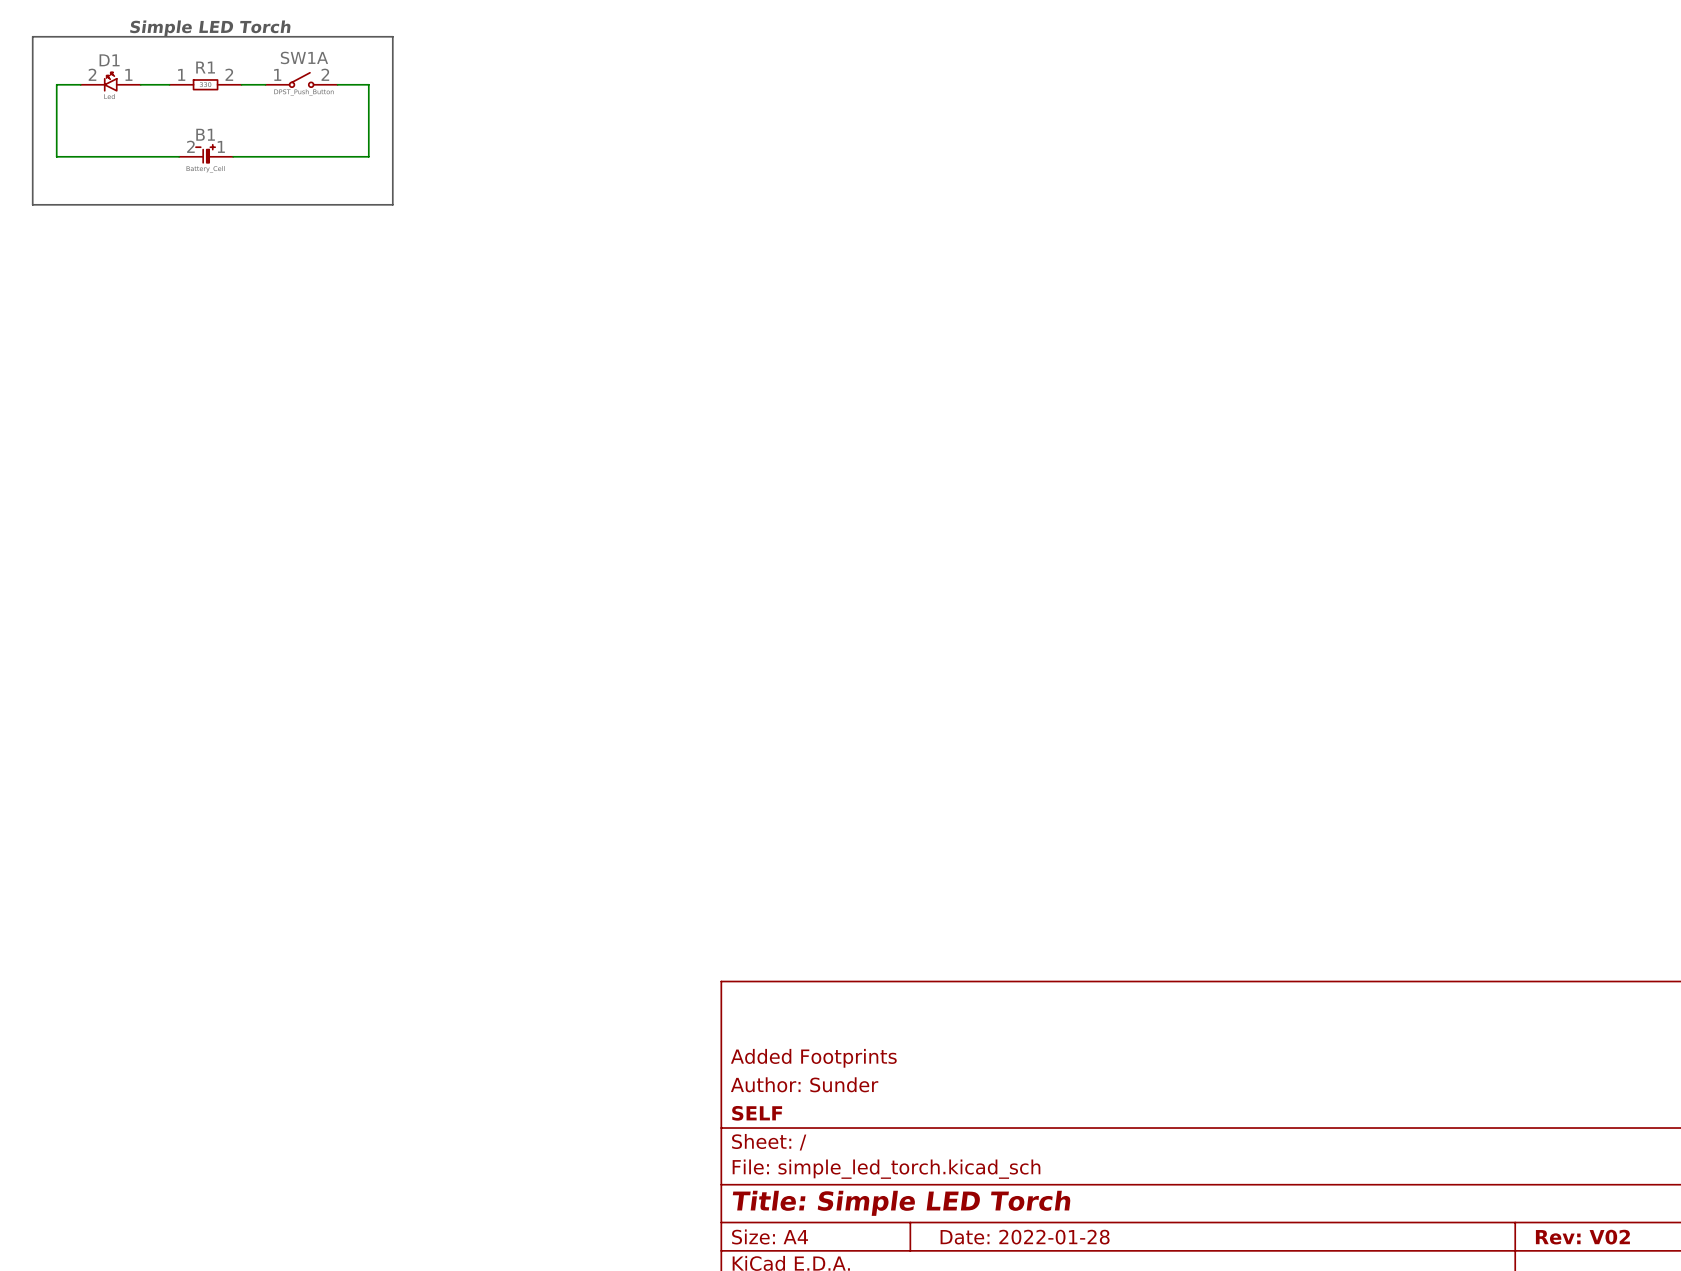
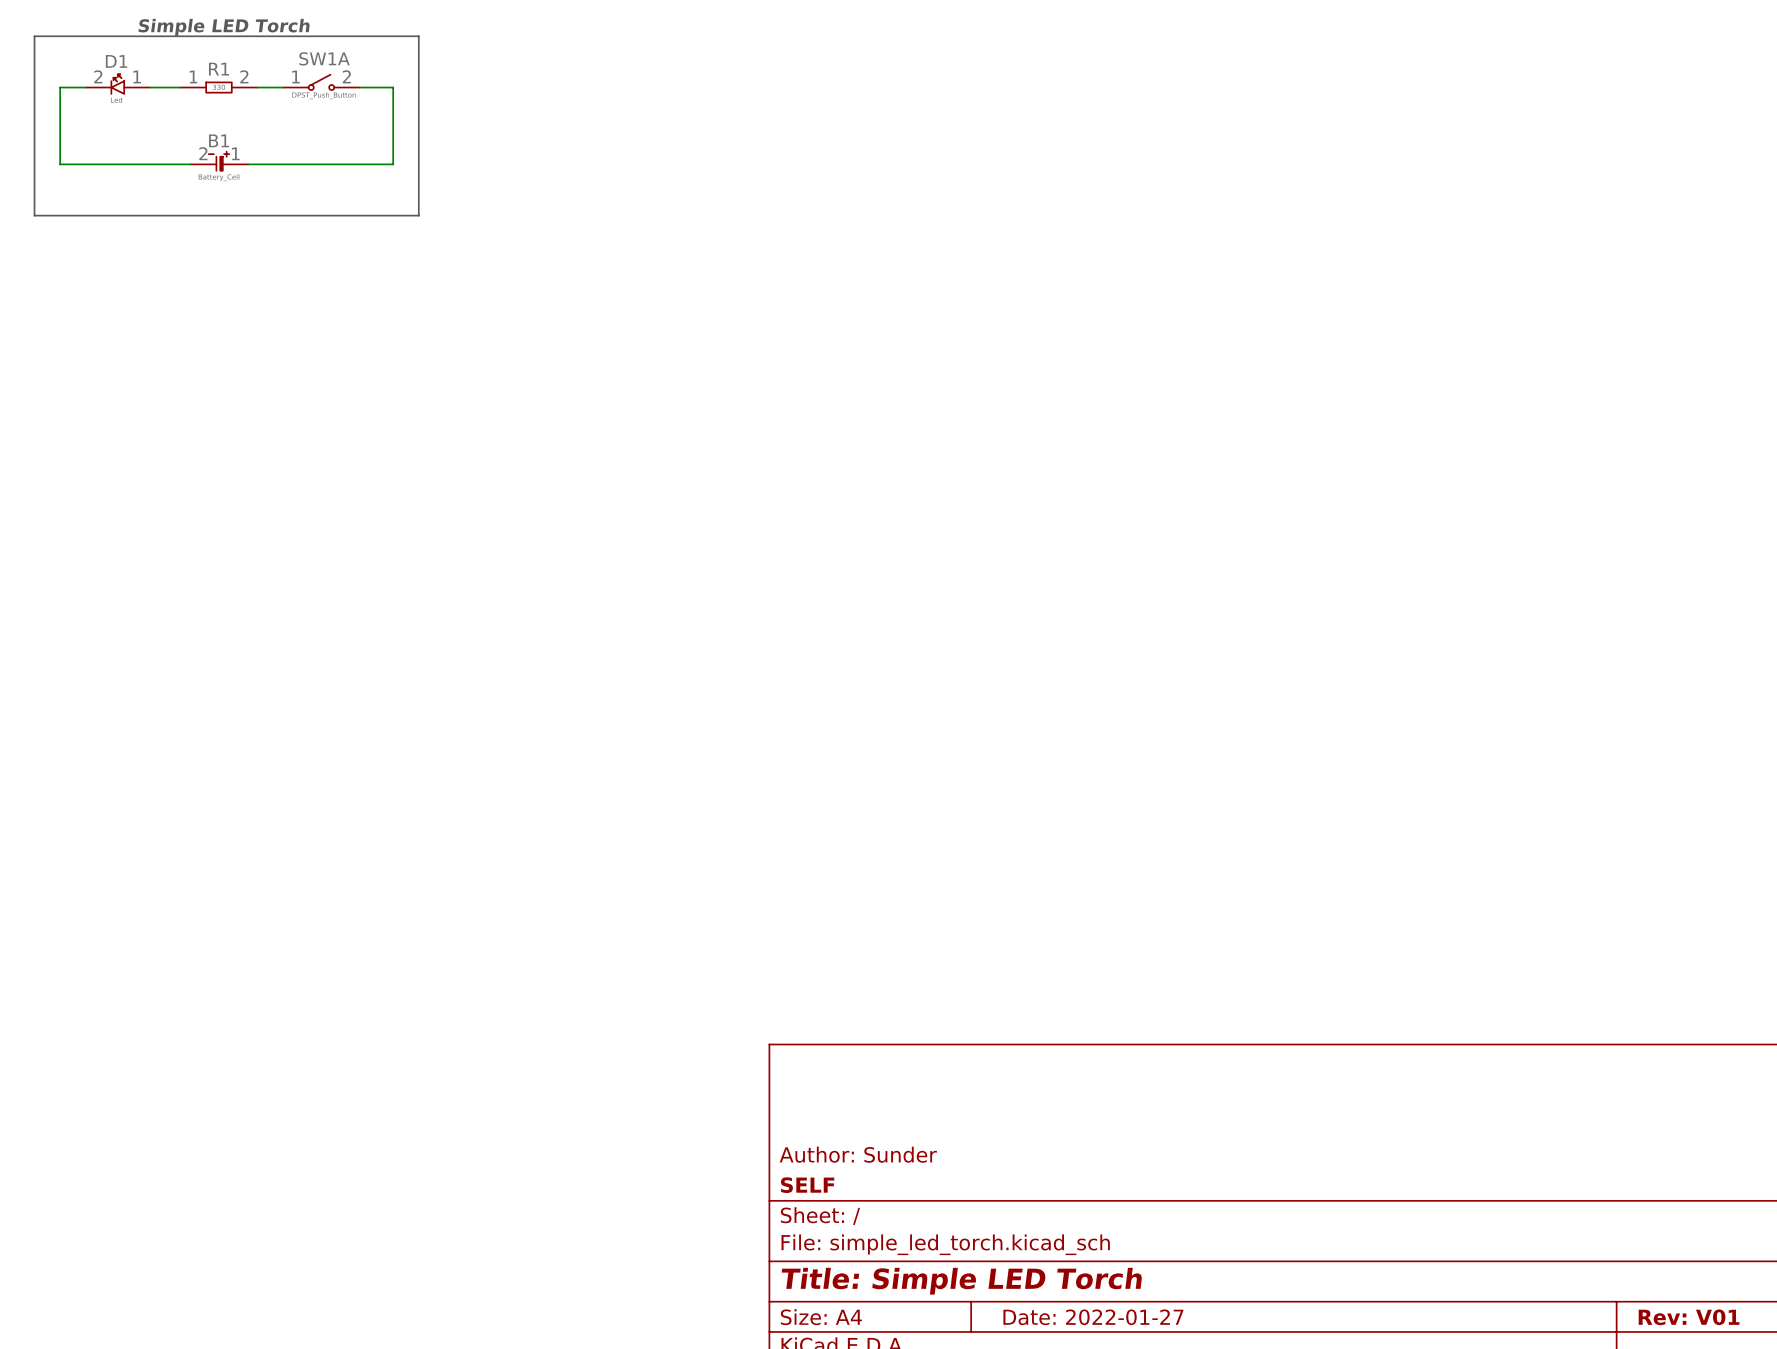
title block: Added Footprints (813, 1058) -> none
title block: Date: 2022-01-28 (1025, 1237) -> Date: 2022-01-27 (1093, 1317)
title block: Rev: V02 (1582, 1237) -> Rev: V01 (1689, 1317)

